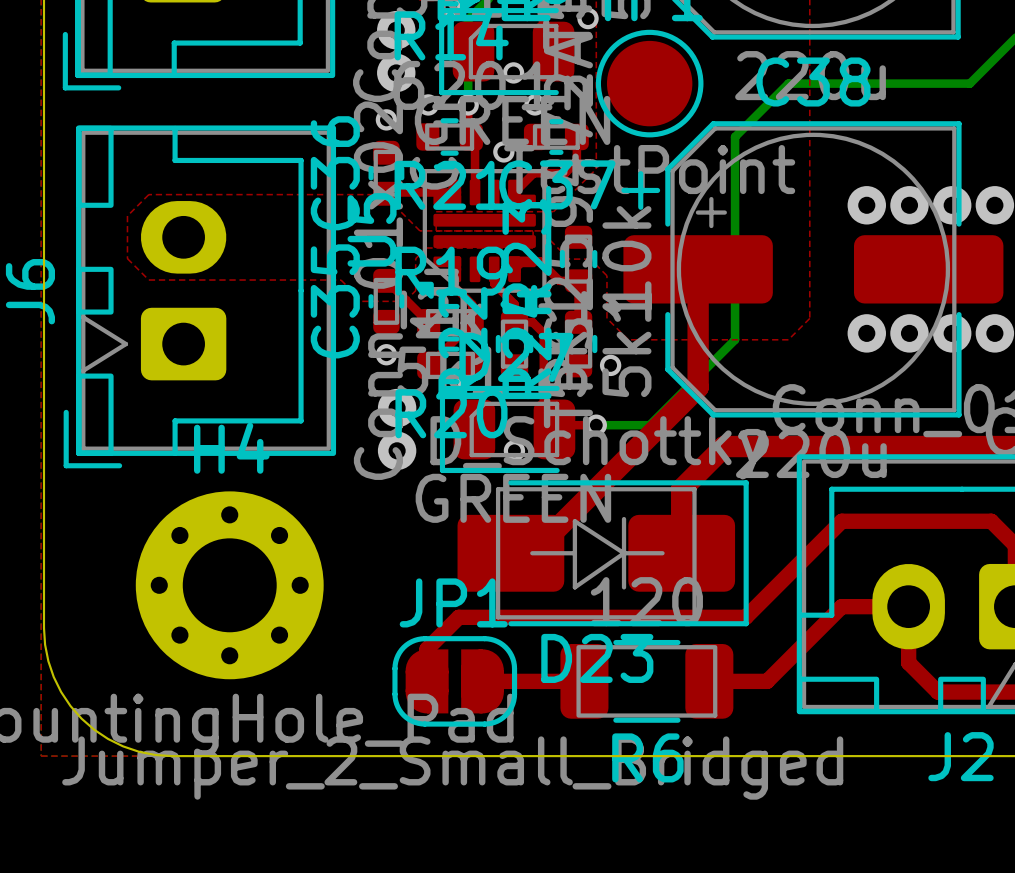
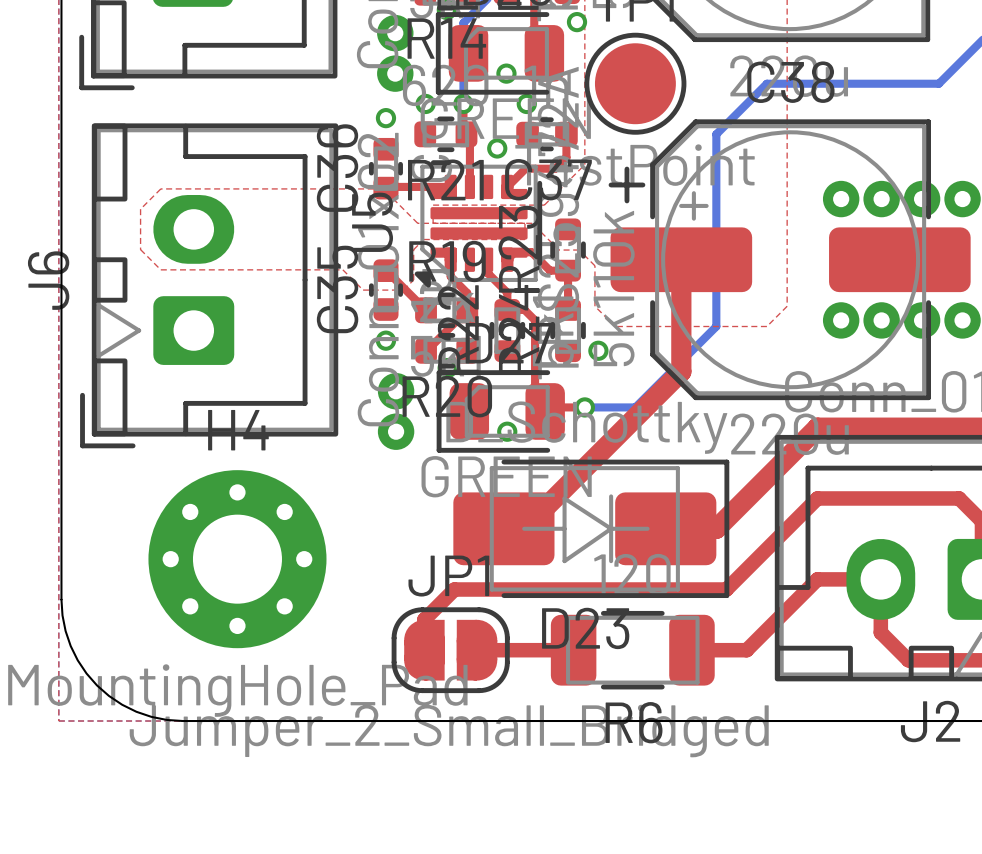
top track: (841, 446) (724, 446) (681, 489) (681, 553) -> (817, 427) (716, 528) (665, 528)

